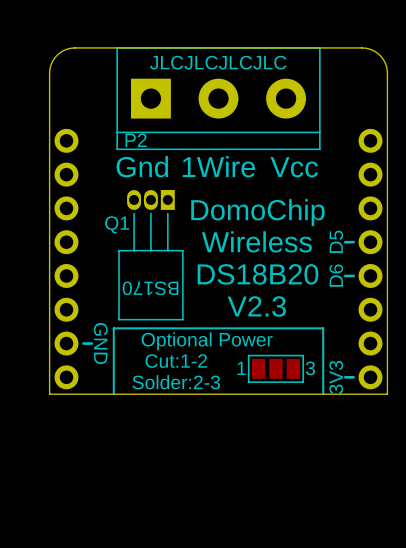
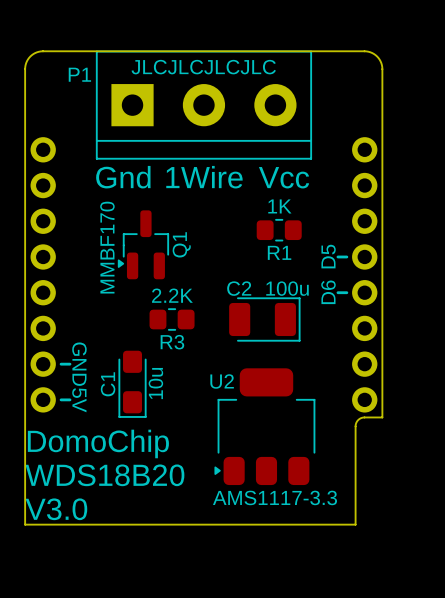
board edge: (74, 47) (362, 47) (371, 49) (379, 55) (385, 63) (387, 73) (387, 394) (49, 394) (49, 69) (57, 55) (65, 49) (74, 47) -> (42, 51) (30, 56) (25, 69) (25, 524) (355, 524) (355, 424) (362, 417) (382, 417) (382, 69) (379, 59) (374, 54) (364, 51) (42, 51)
P2 name: P2 (136, 140) -> P1 (79, 74)
Q1 footprint: [118, 189, 184, 321] -> [117, 210, 170, 280]
text position: DomoChip (257, 212) -> DomoChip (98, 443)
R1: none -> 1K (279, 230)
Q1 name position: Q1 (117, 224) -> Q1 (181, 244)
text: Wireless (256, 241) -> none
text: DS18B20 (257, 274) -> none
Q1 value: BS170 (150, 288) -> MMBF170 (107, 247)
R3: none -> 2.2K (172, 319)
C2: none -> 100u (264, 319)
text: V2.3 (256, 306) -> none
text: Optional Power (207, 341) -> none
text: Cut:1-2 (176, 361) -> none
C1: none -> 10u (132, 384)
part: (275, 368) -> none
text: none -> 5V (79, 400)
text: 3V3 (336, 377) -> none
line: (345, 377) (353, 377) -> (61, 399) (70, 399)
text: Solder:2-3 (176, 382) -> none
line: (113, 394) (113, 328) (323, 328) (323, 394) -> none
U2: none -> AMS1117-3.3 (264, 426)
text: none -> WDS18B20 (104, 475)
text: none -> V3.0 (56, 509)

